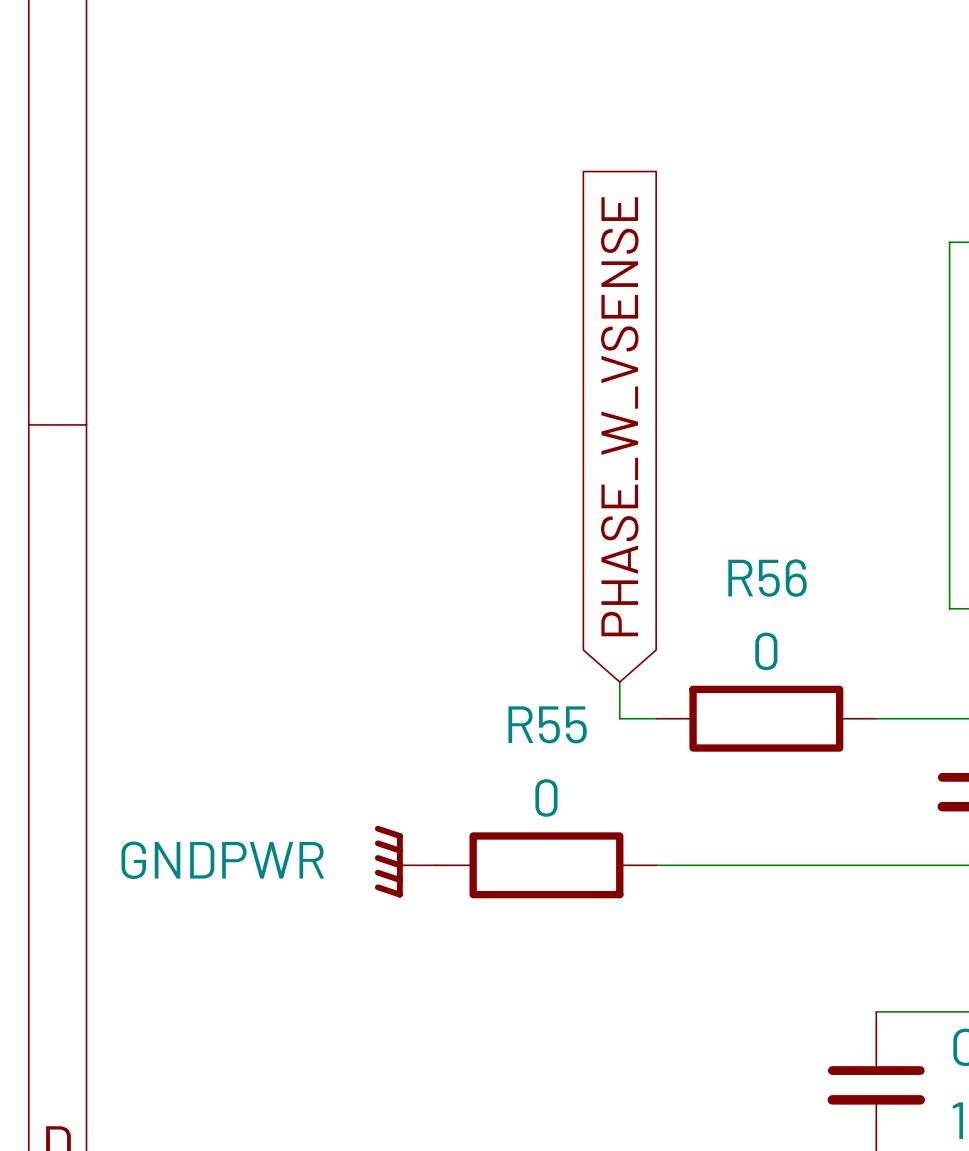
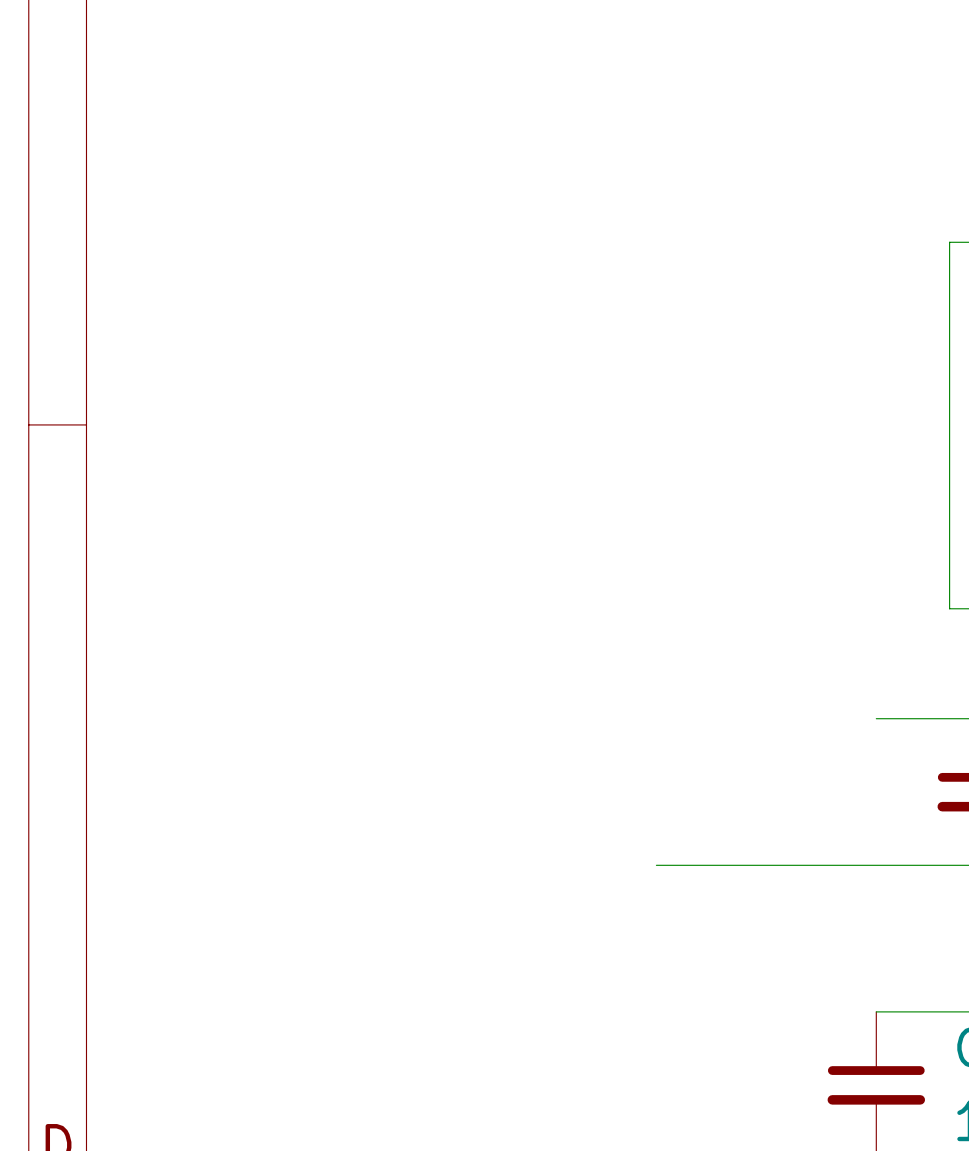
global label: PHASE_W_VSENSE (619, 416) -> none
wire: (619, 682) (619, 718) (656, 718) -> none
R56: 0 (766, 718) -> none
power symbol: GNDPWR (405, 861) -> none
R55: 0 (546, 865) -> none

